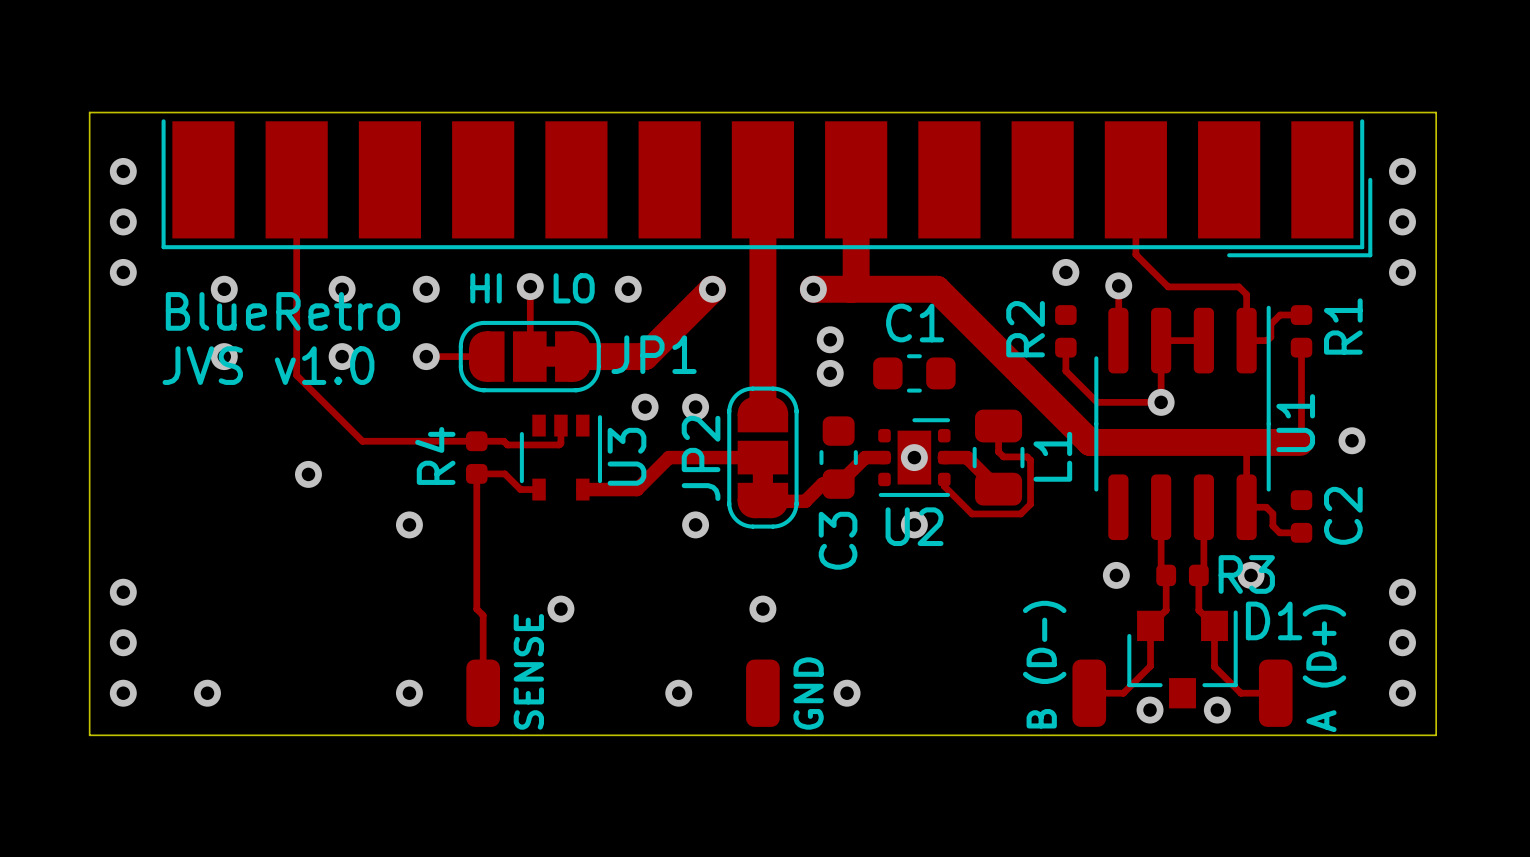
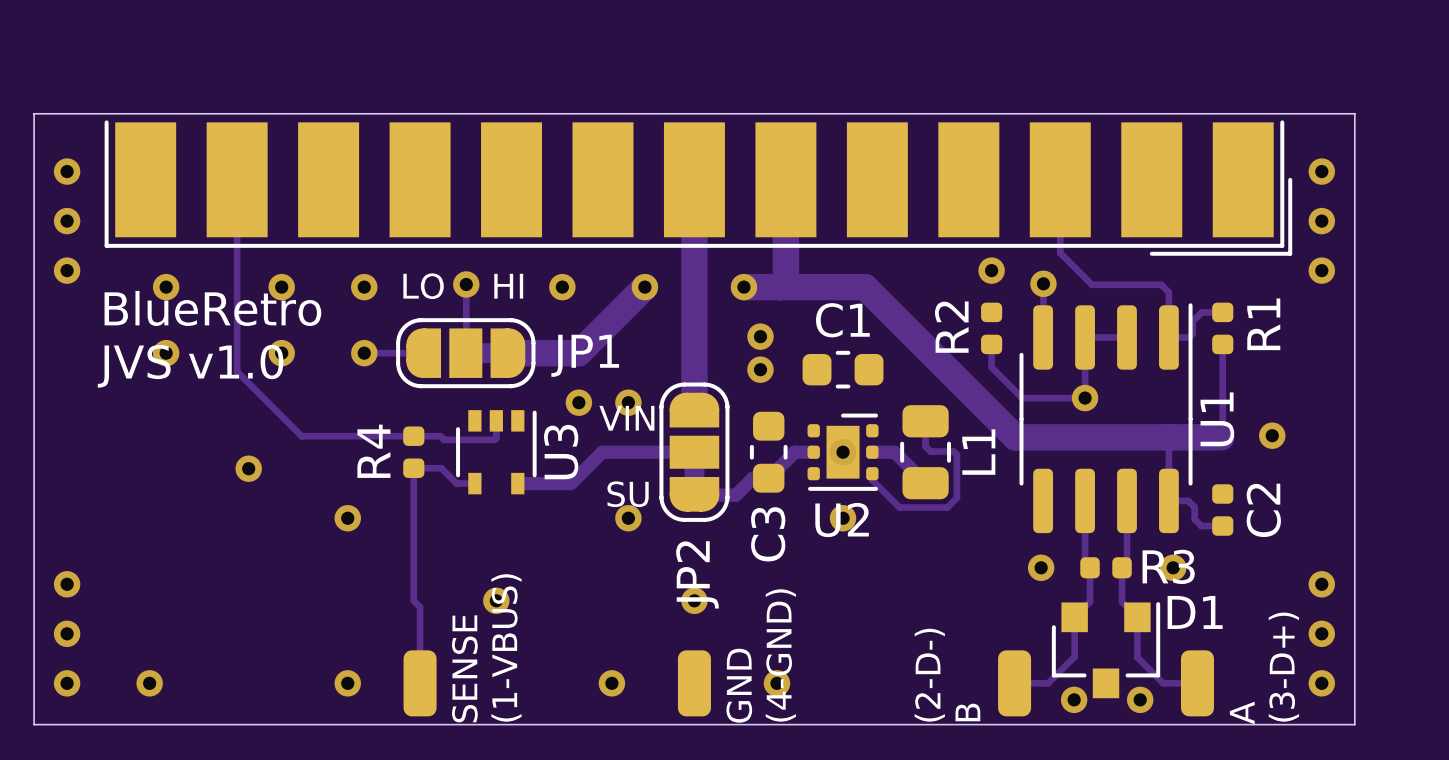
text: HI (486, 288) -> LO (423, 286)
text: LO (574, 288) -> HI (508, 286)
text: none -> VIN (626, 418)
JP2 name position: JP2 (701, 458) -> JP2 (697, 574)
text: none -> SU (628, 494)
text: none -> (1-VBUS) (506, 647)
text: none -> (4-GND) (780, 655)
text: none -> (2-D-) (929, 675)
text: none -> (3-D+) (1283, 667)
text: B (D-) (1044, 664) -> B (967, 712)
text: A (D+) (1324, 668) -> A (1242, 713)

